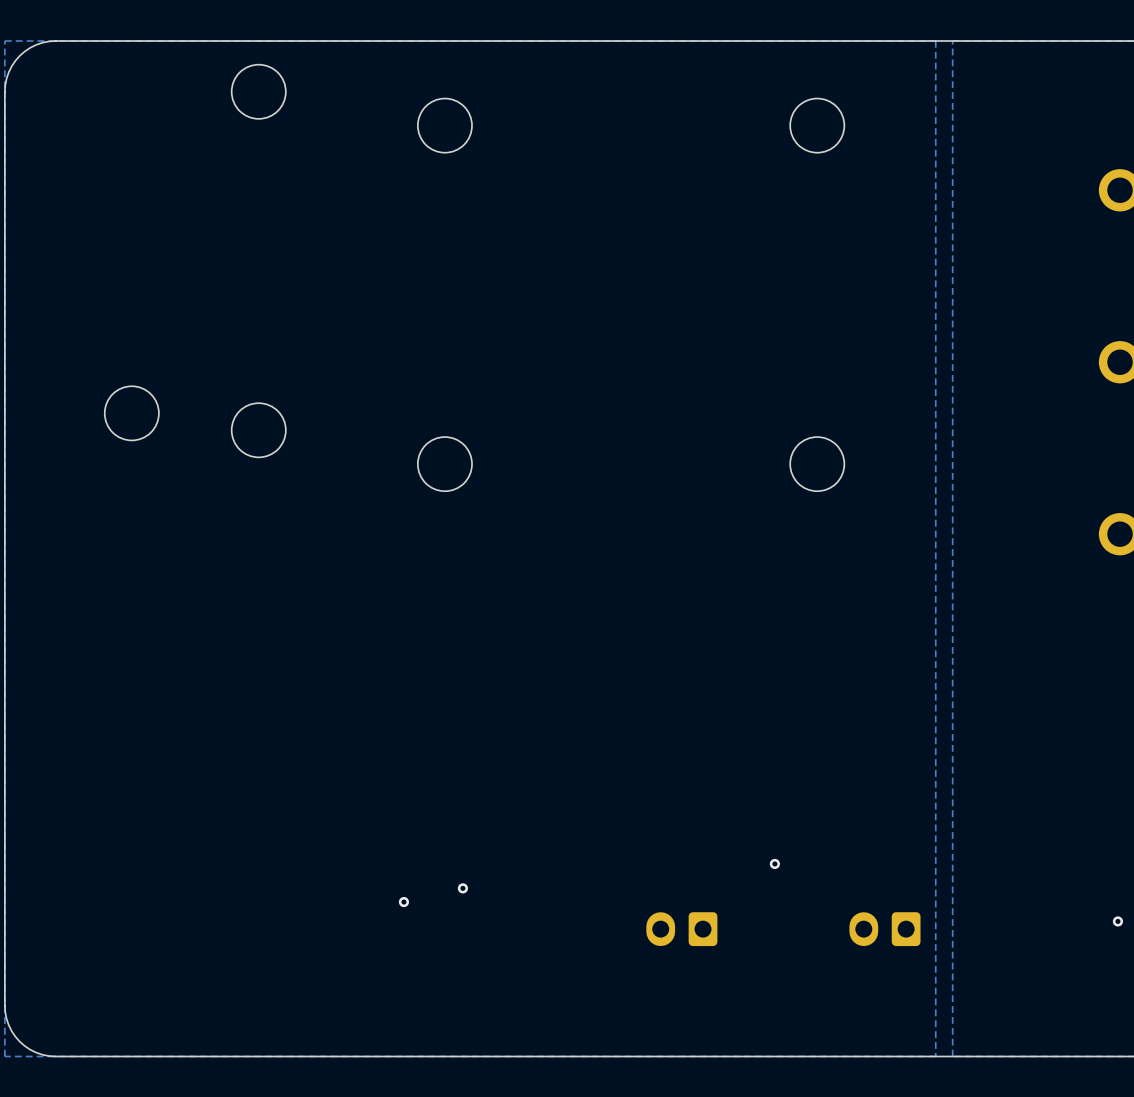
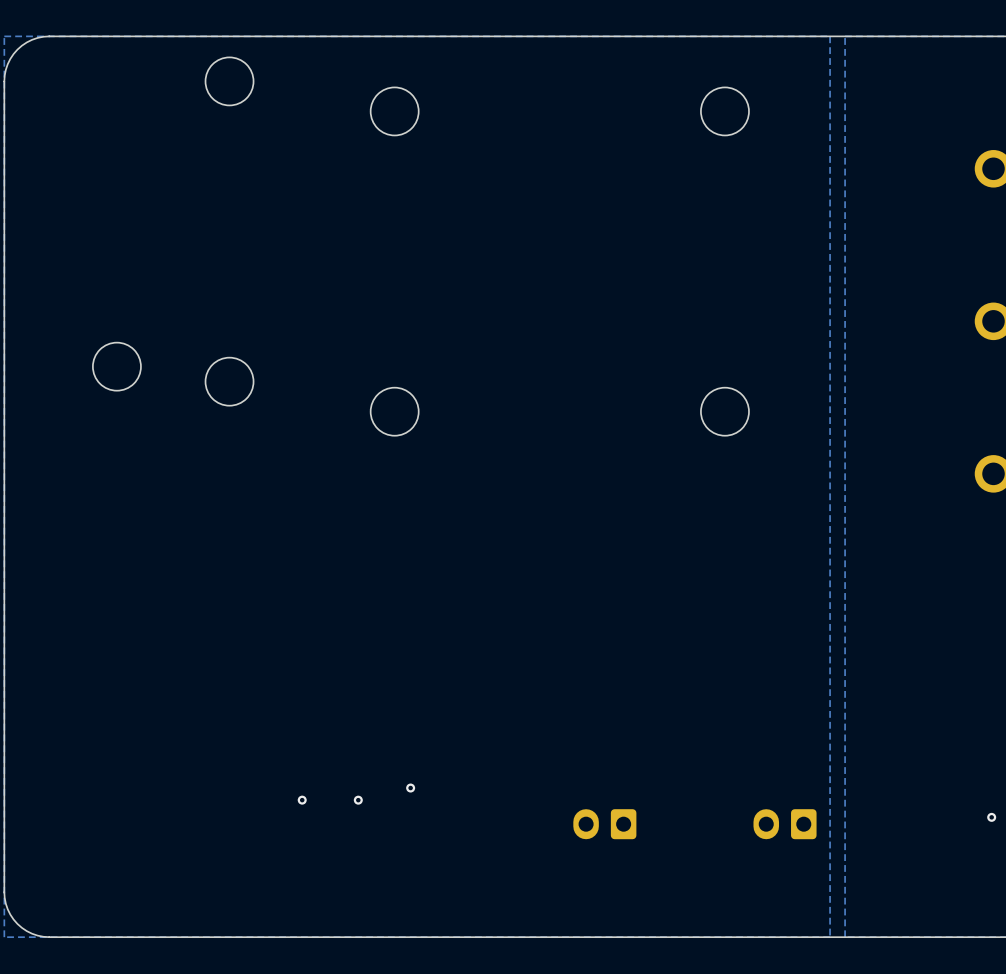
via: (774, 863) -> none
via: none -> (302, 800)

